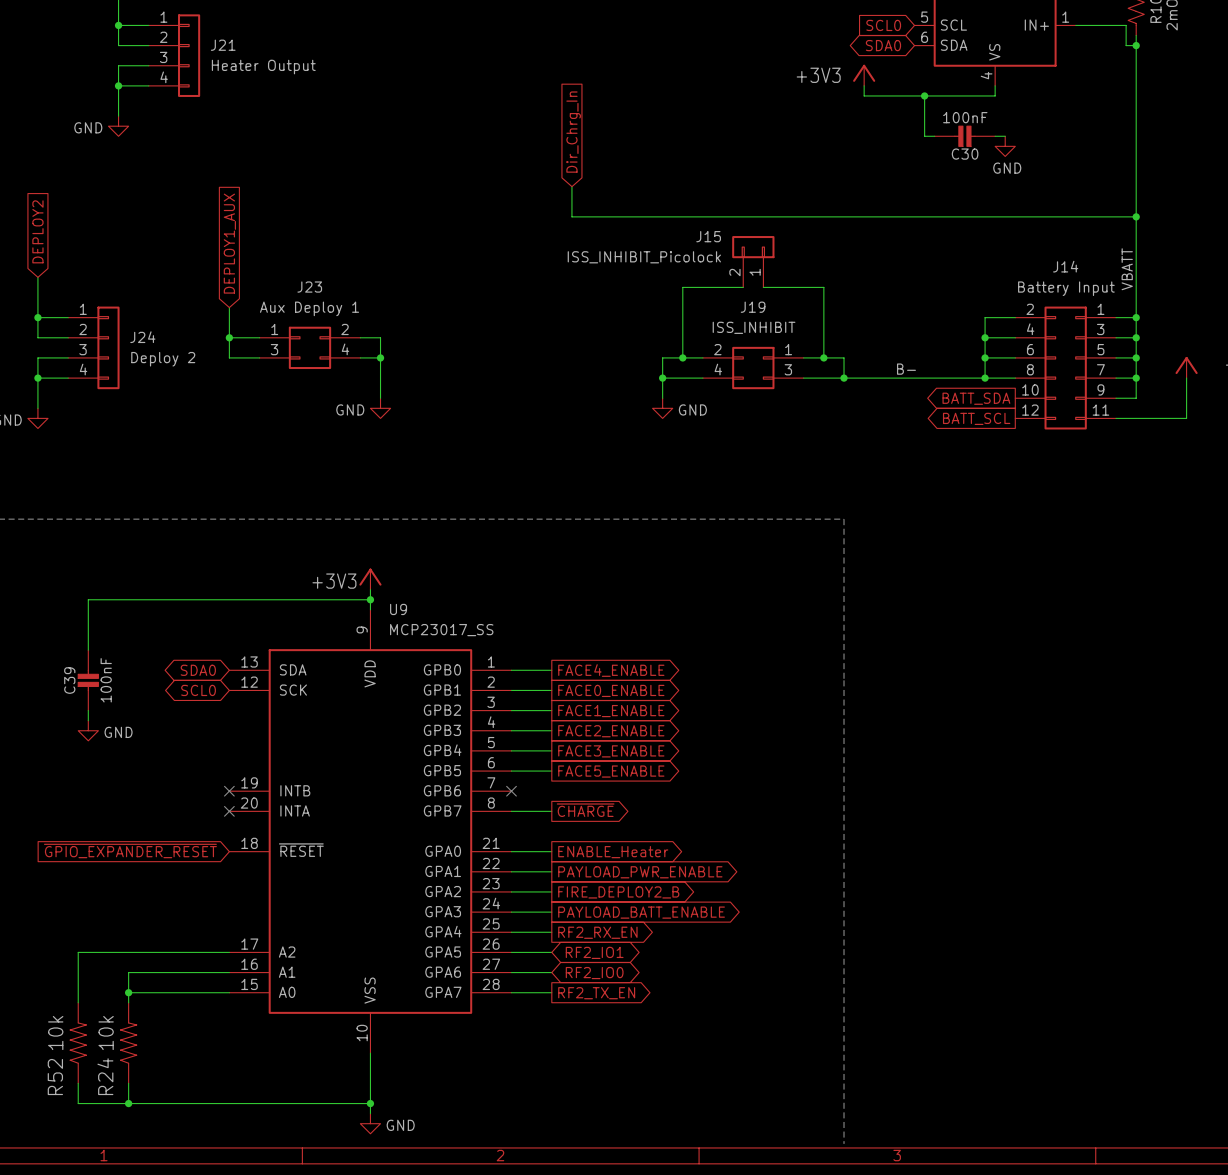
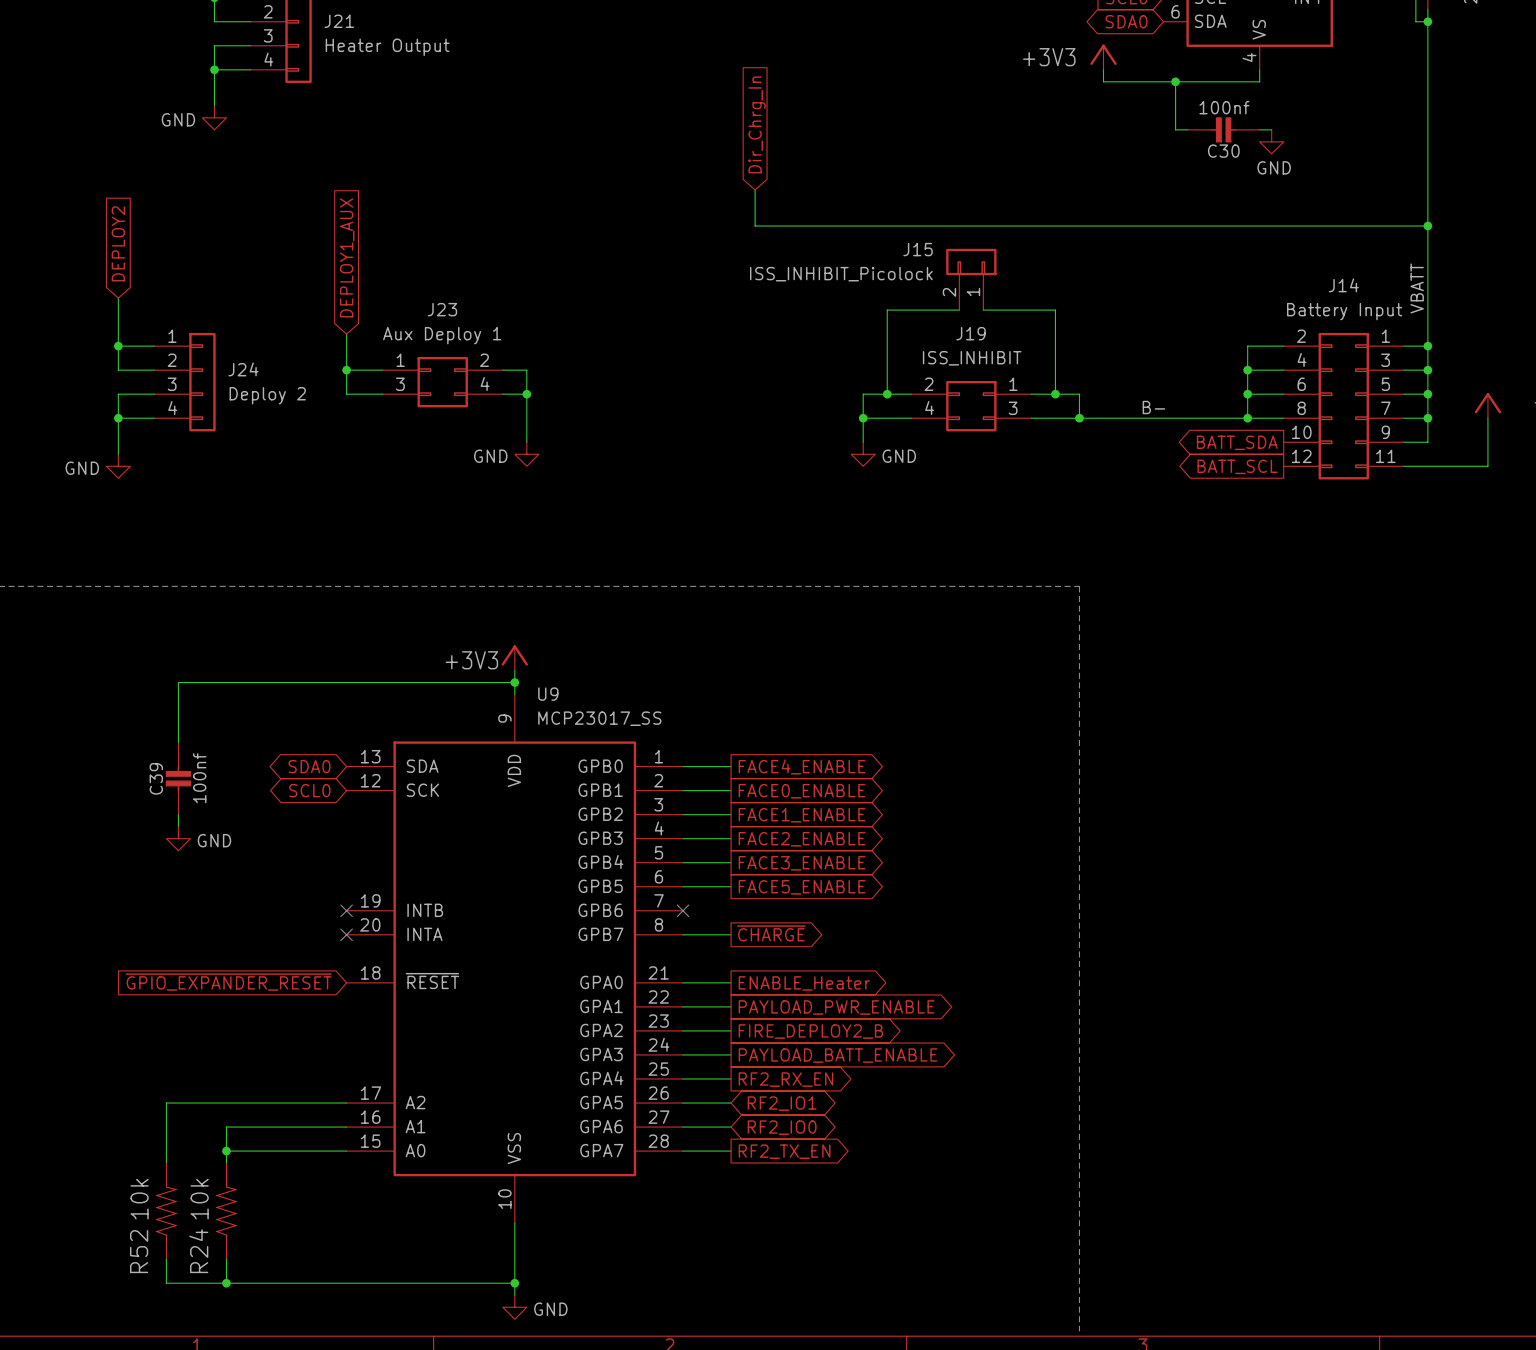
C30 value: 100nF (965, 117) -> 100nf (1224, 107)
C39 value: 100nF (106, 680) -> 100nf (199, 778)

